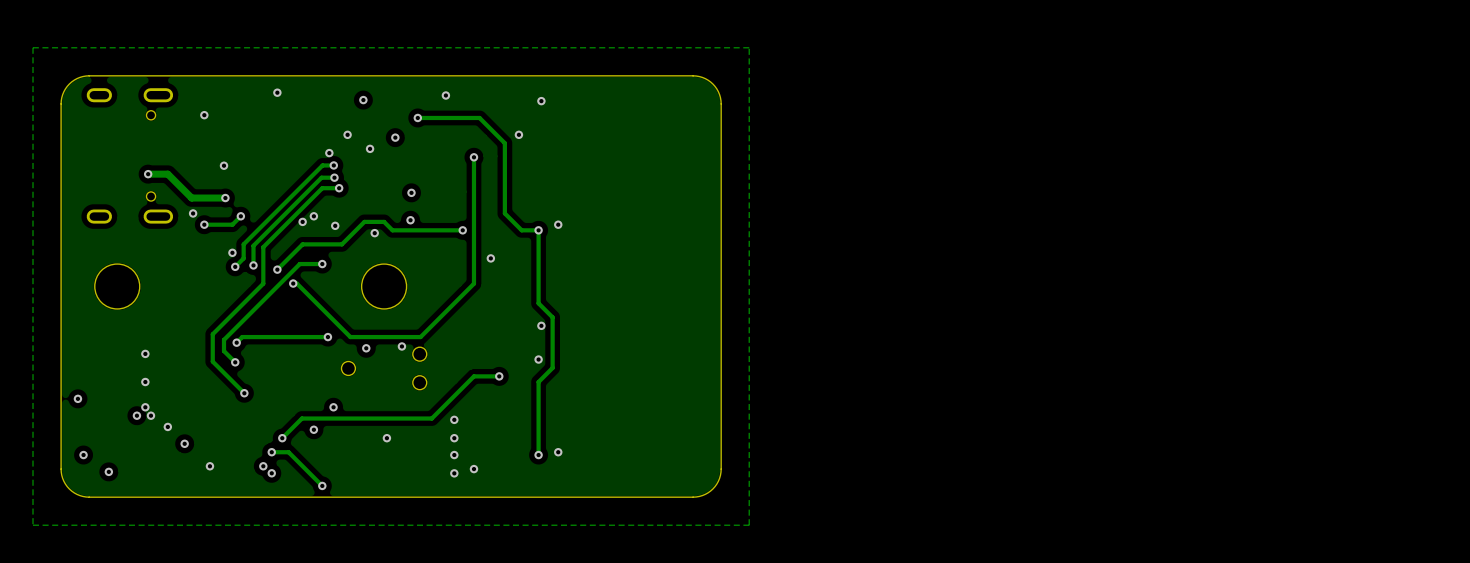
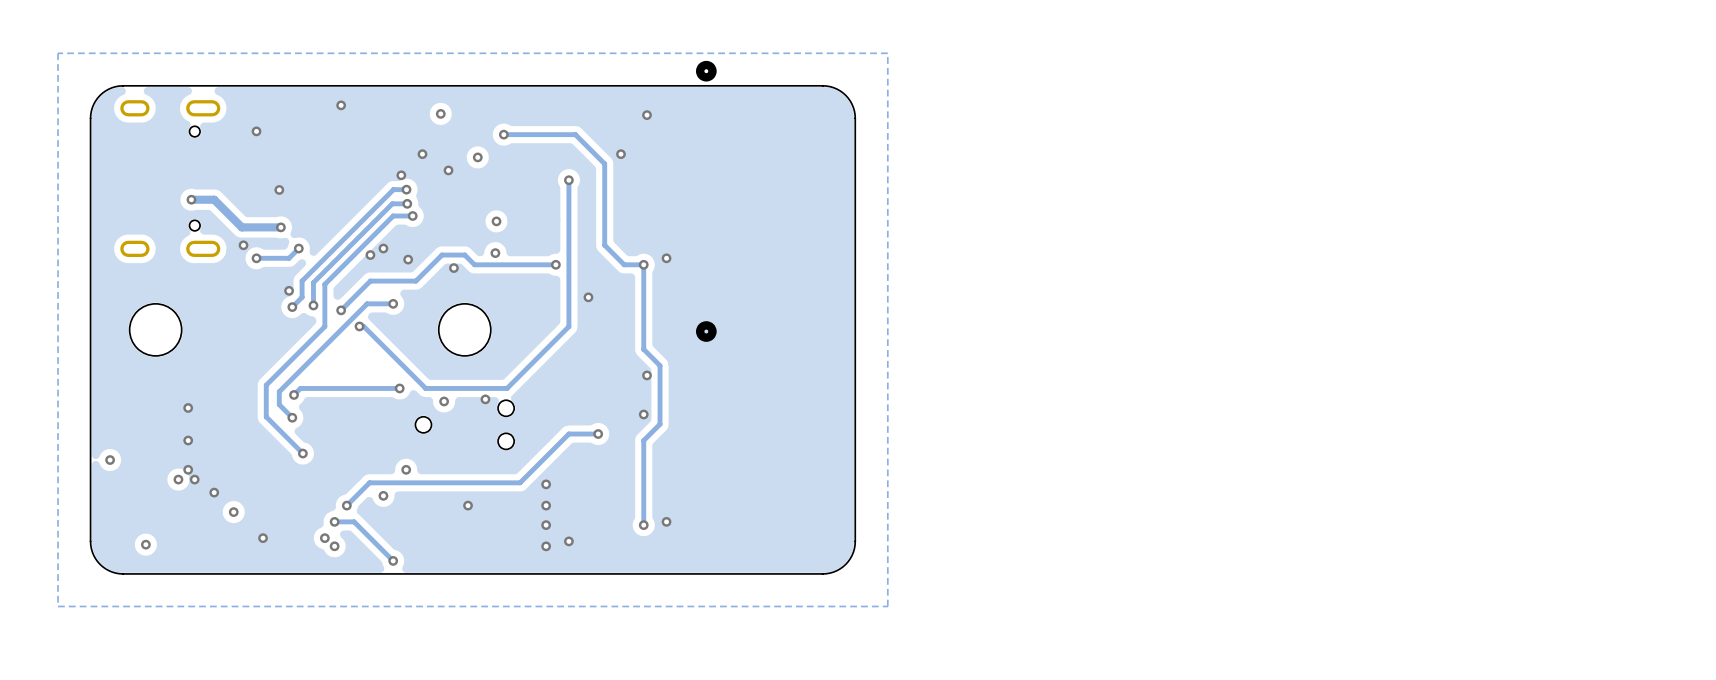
part: none -> (706, 71)
via: (445, 95) -> none
part: none -> (706, 331)
via: (83, 455) -> none

